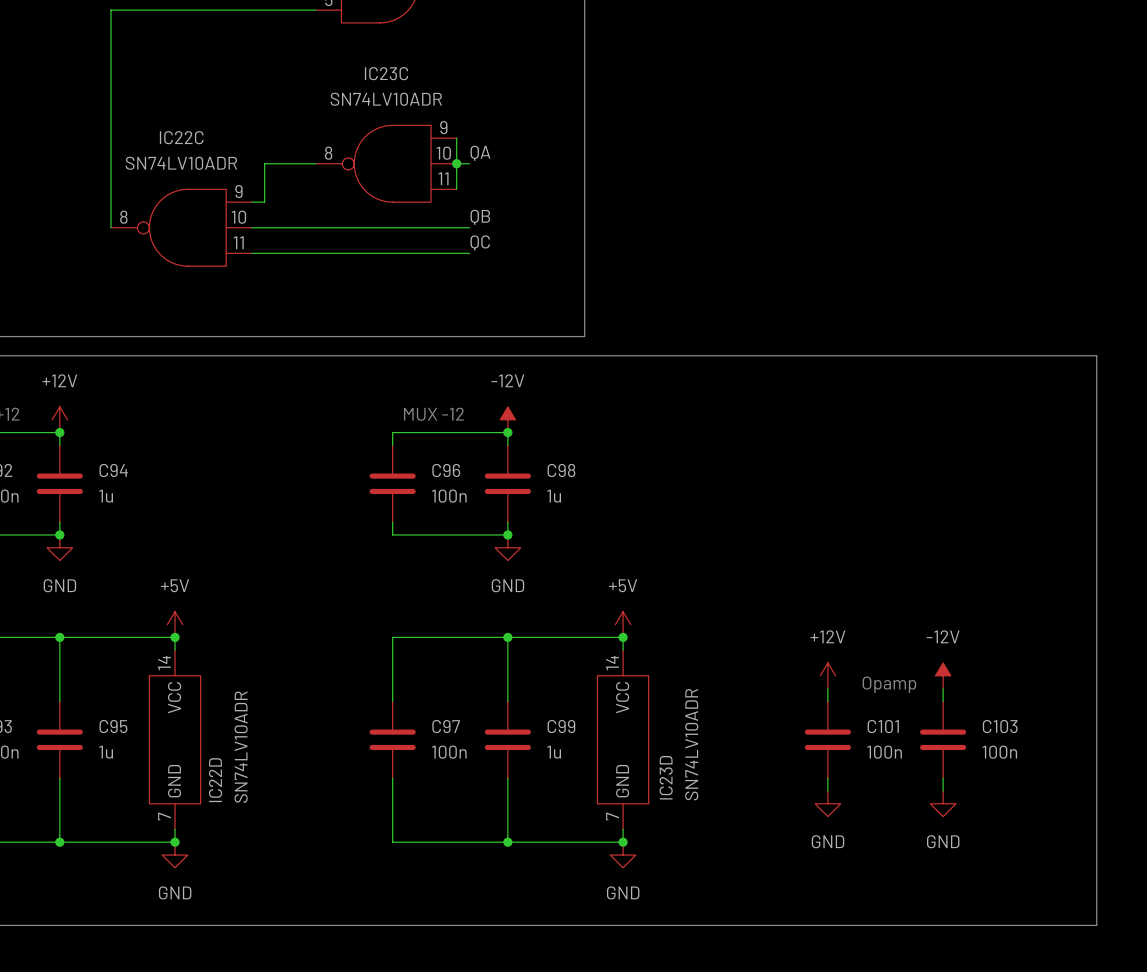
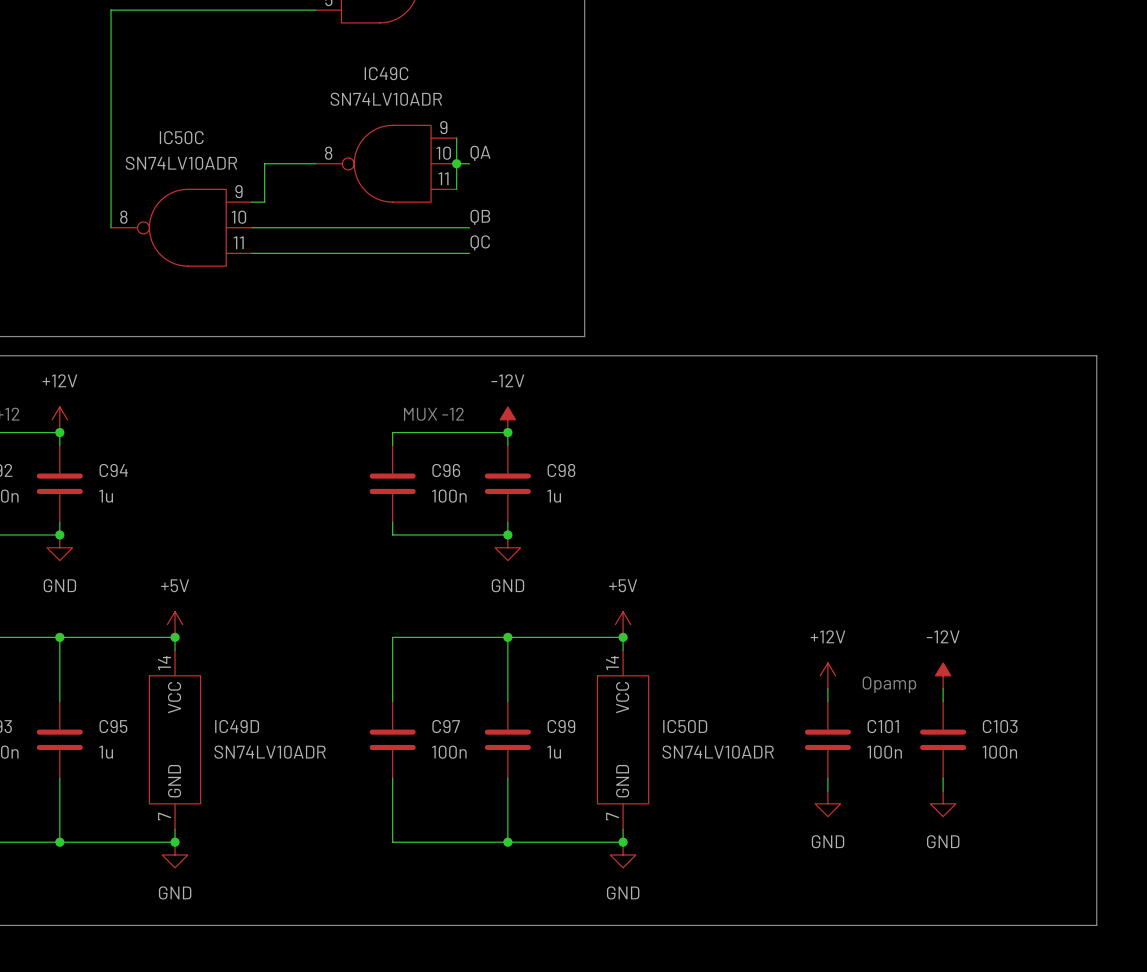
IC23C name: IC23C (386, 73) -> IC49C (386, 73)
IC22C name: IC22C (181, 137) -> IC50C (181, 137)
IC23D value rotation: 0° (691, 744) -> 90° clockwise (718, 752)
IC22D value rotation: 0° (241, 747) -> 90° clockwise (270, 752)
IC23D name: IC23D (666, 777) -> IC50D (685, 726)
IC22D name: IC22D (215, 780) -> IC49D (237, 726)

